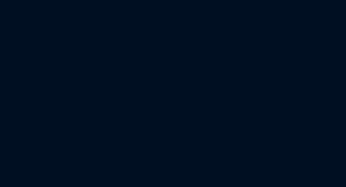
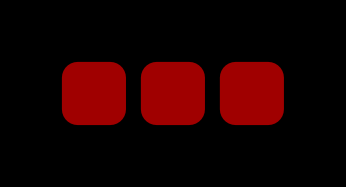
part: none -> (93, 93)
part: none -> (172, 93)
part: none -> (251, 93)

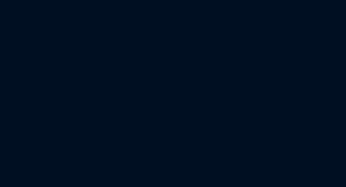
part: (93, 93) -> none
part: (172, 93) -> none
part: (251, 93) -> none

